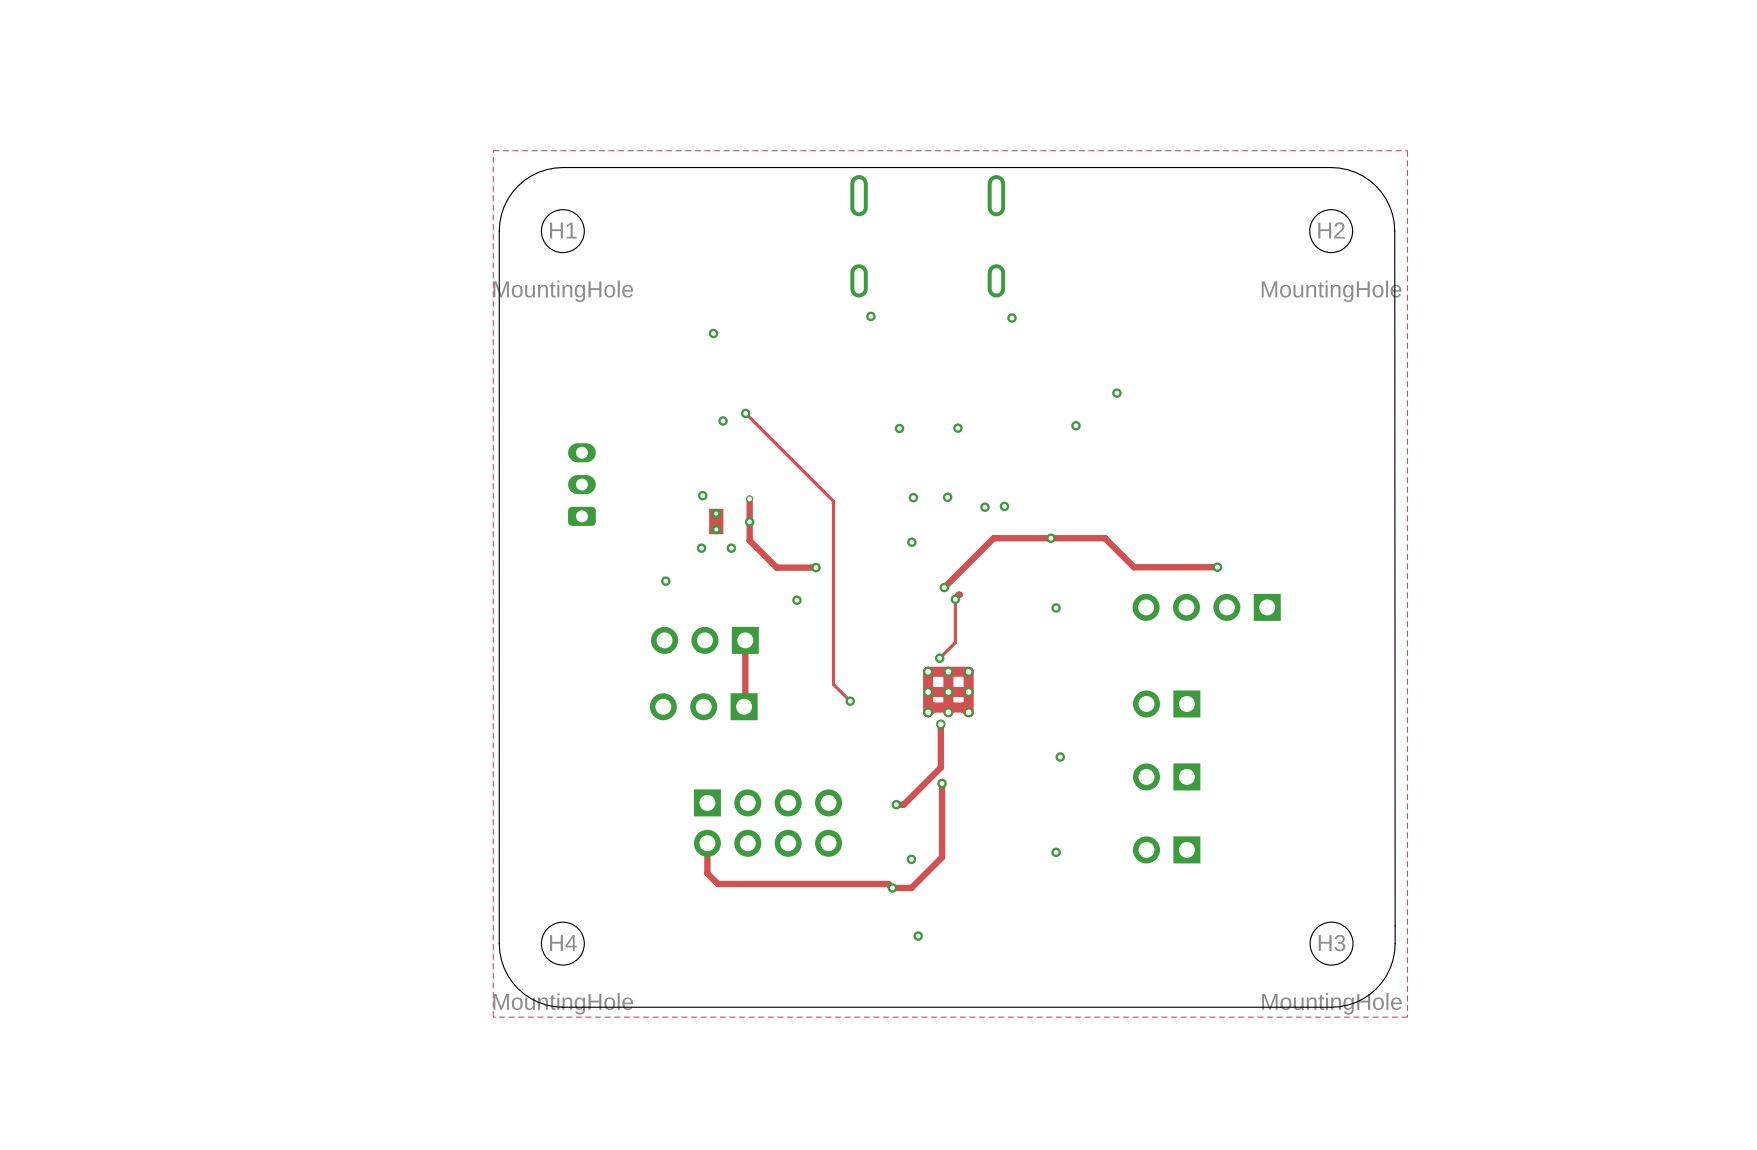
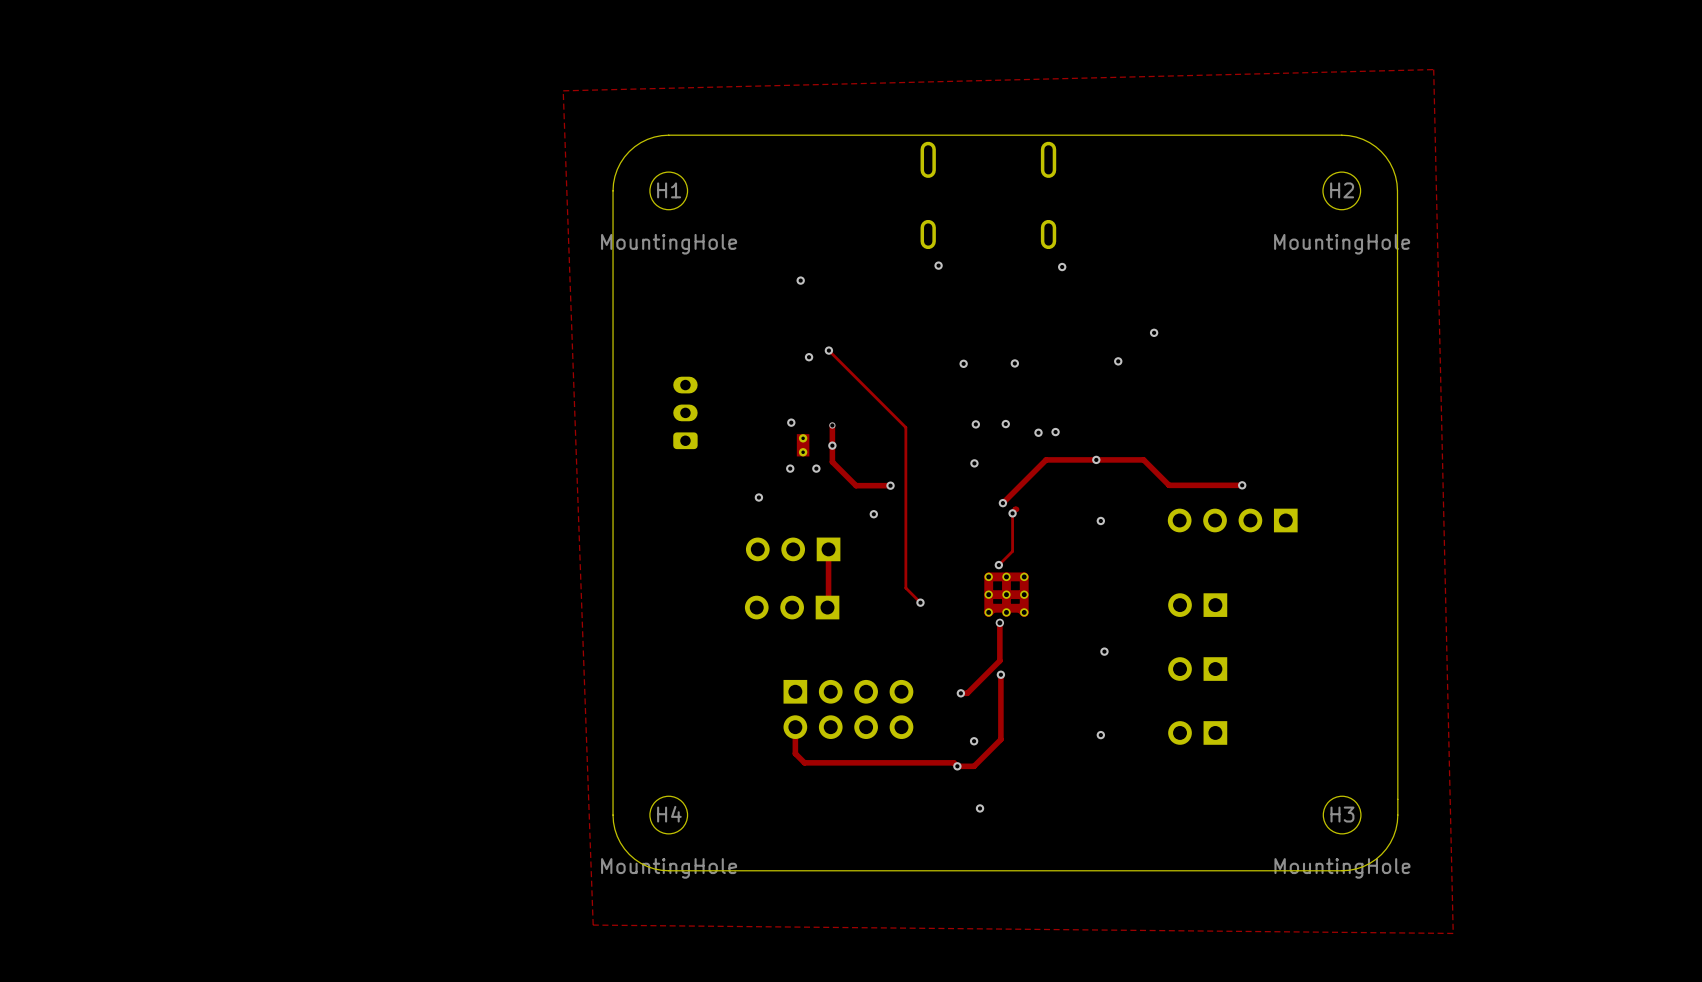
zone outline: (493, 150) (1407, 150) (1407, 1017) (493, 1017) (493, 150) -> (1433, 69) (563, 90) (593, 925) (1453, 933) (1433, 69)

